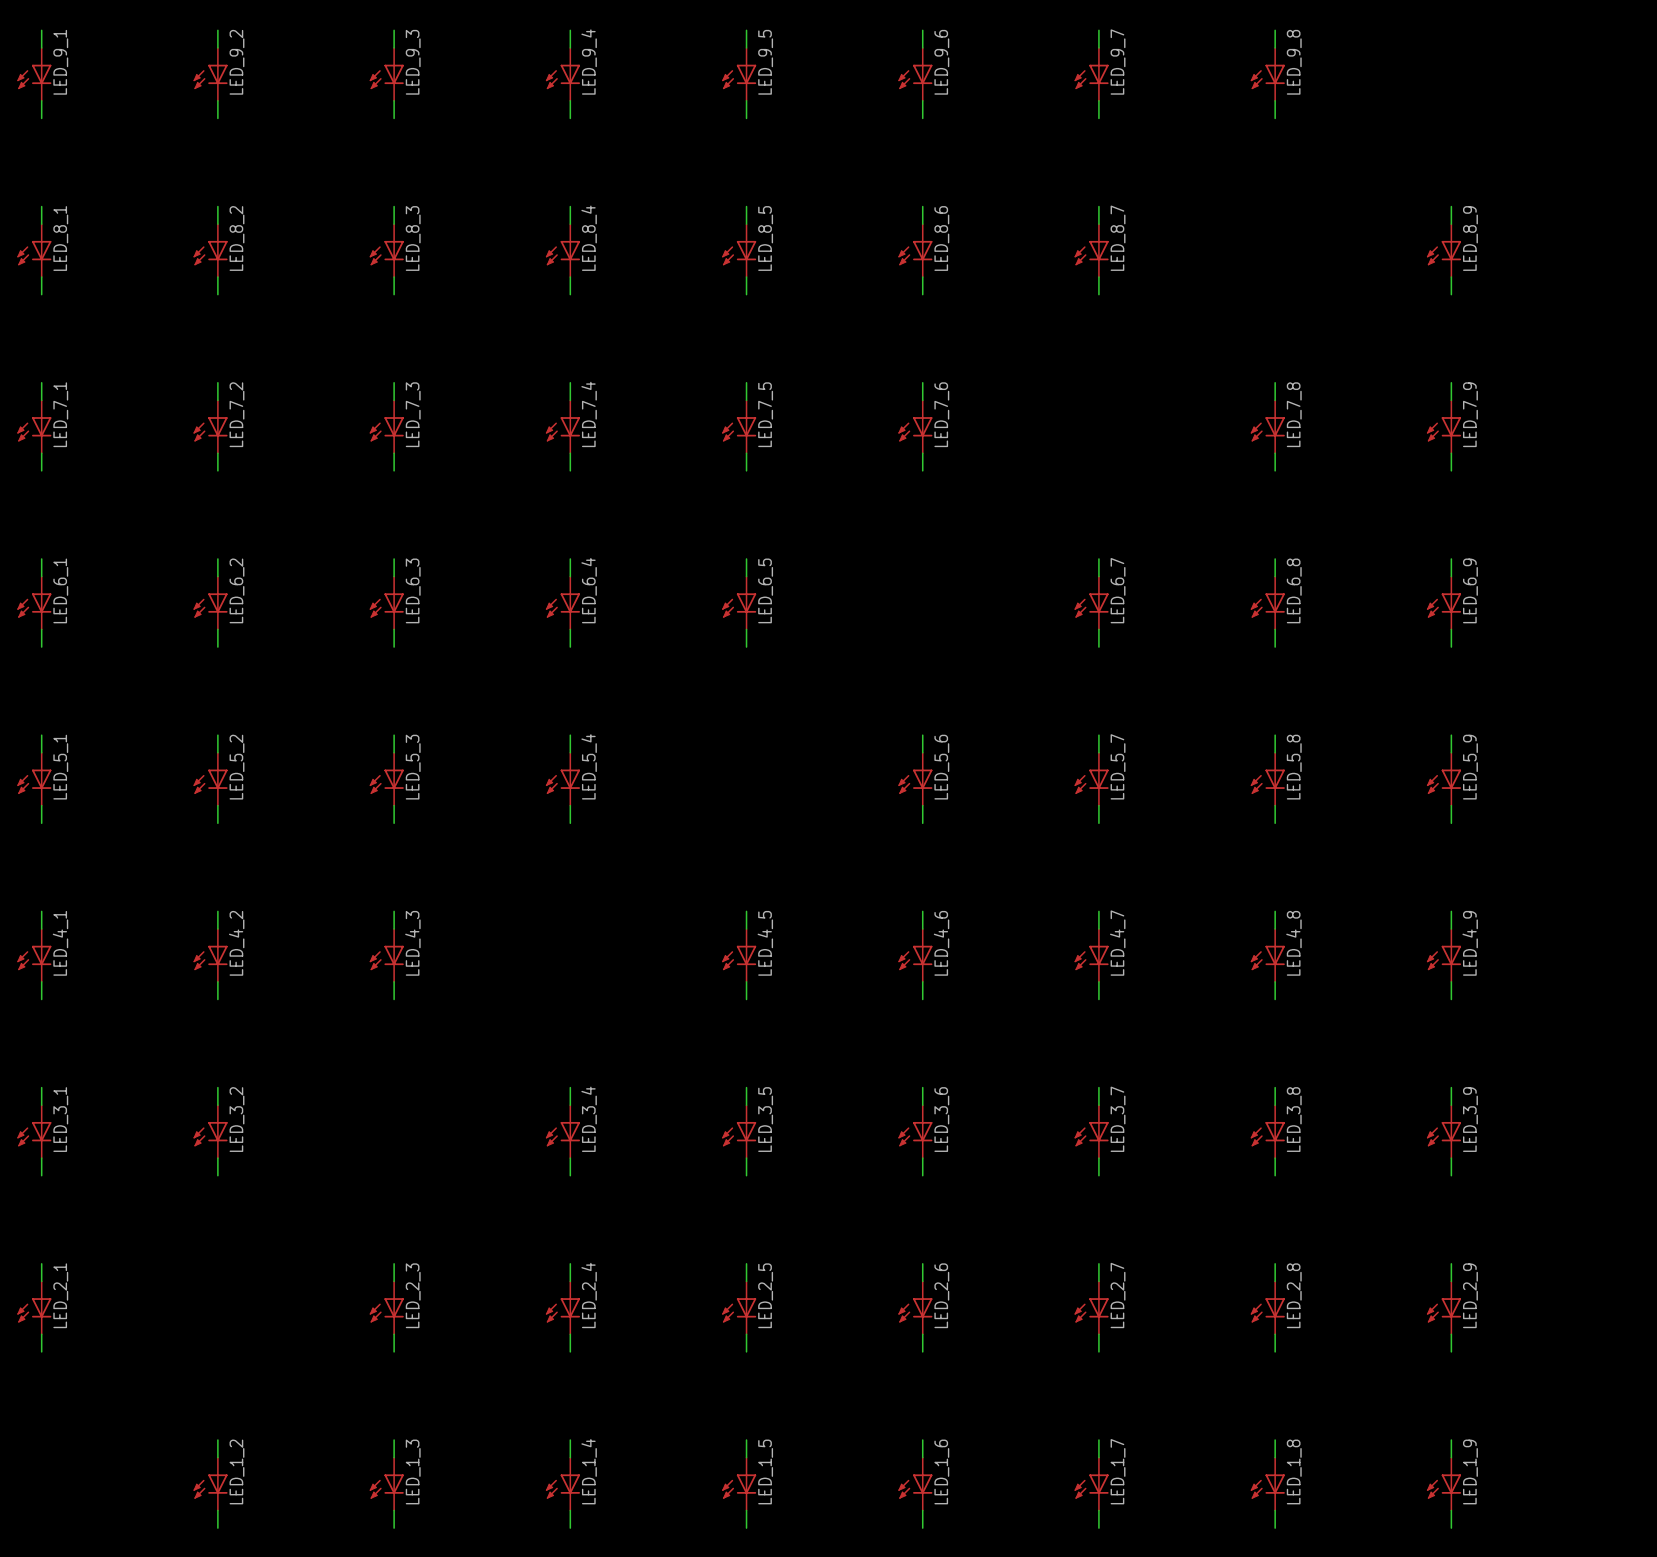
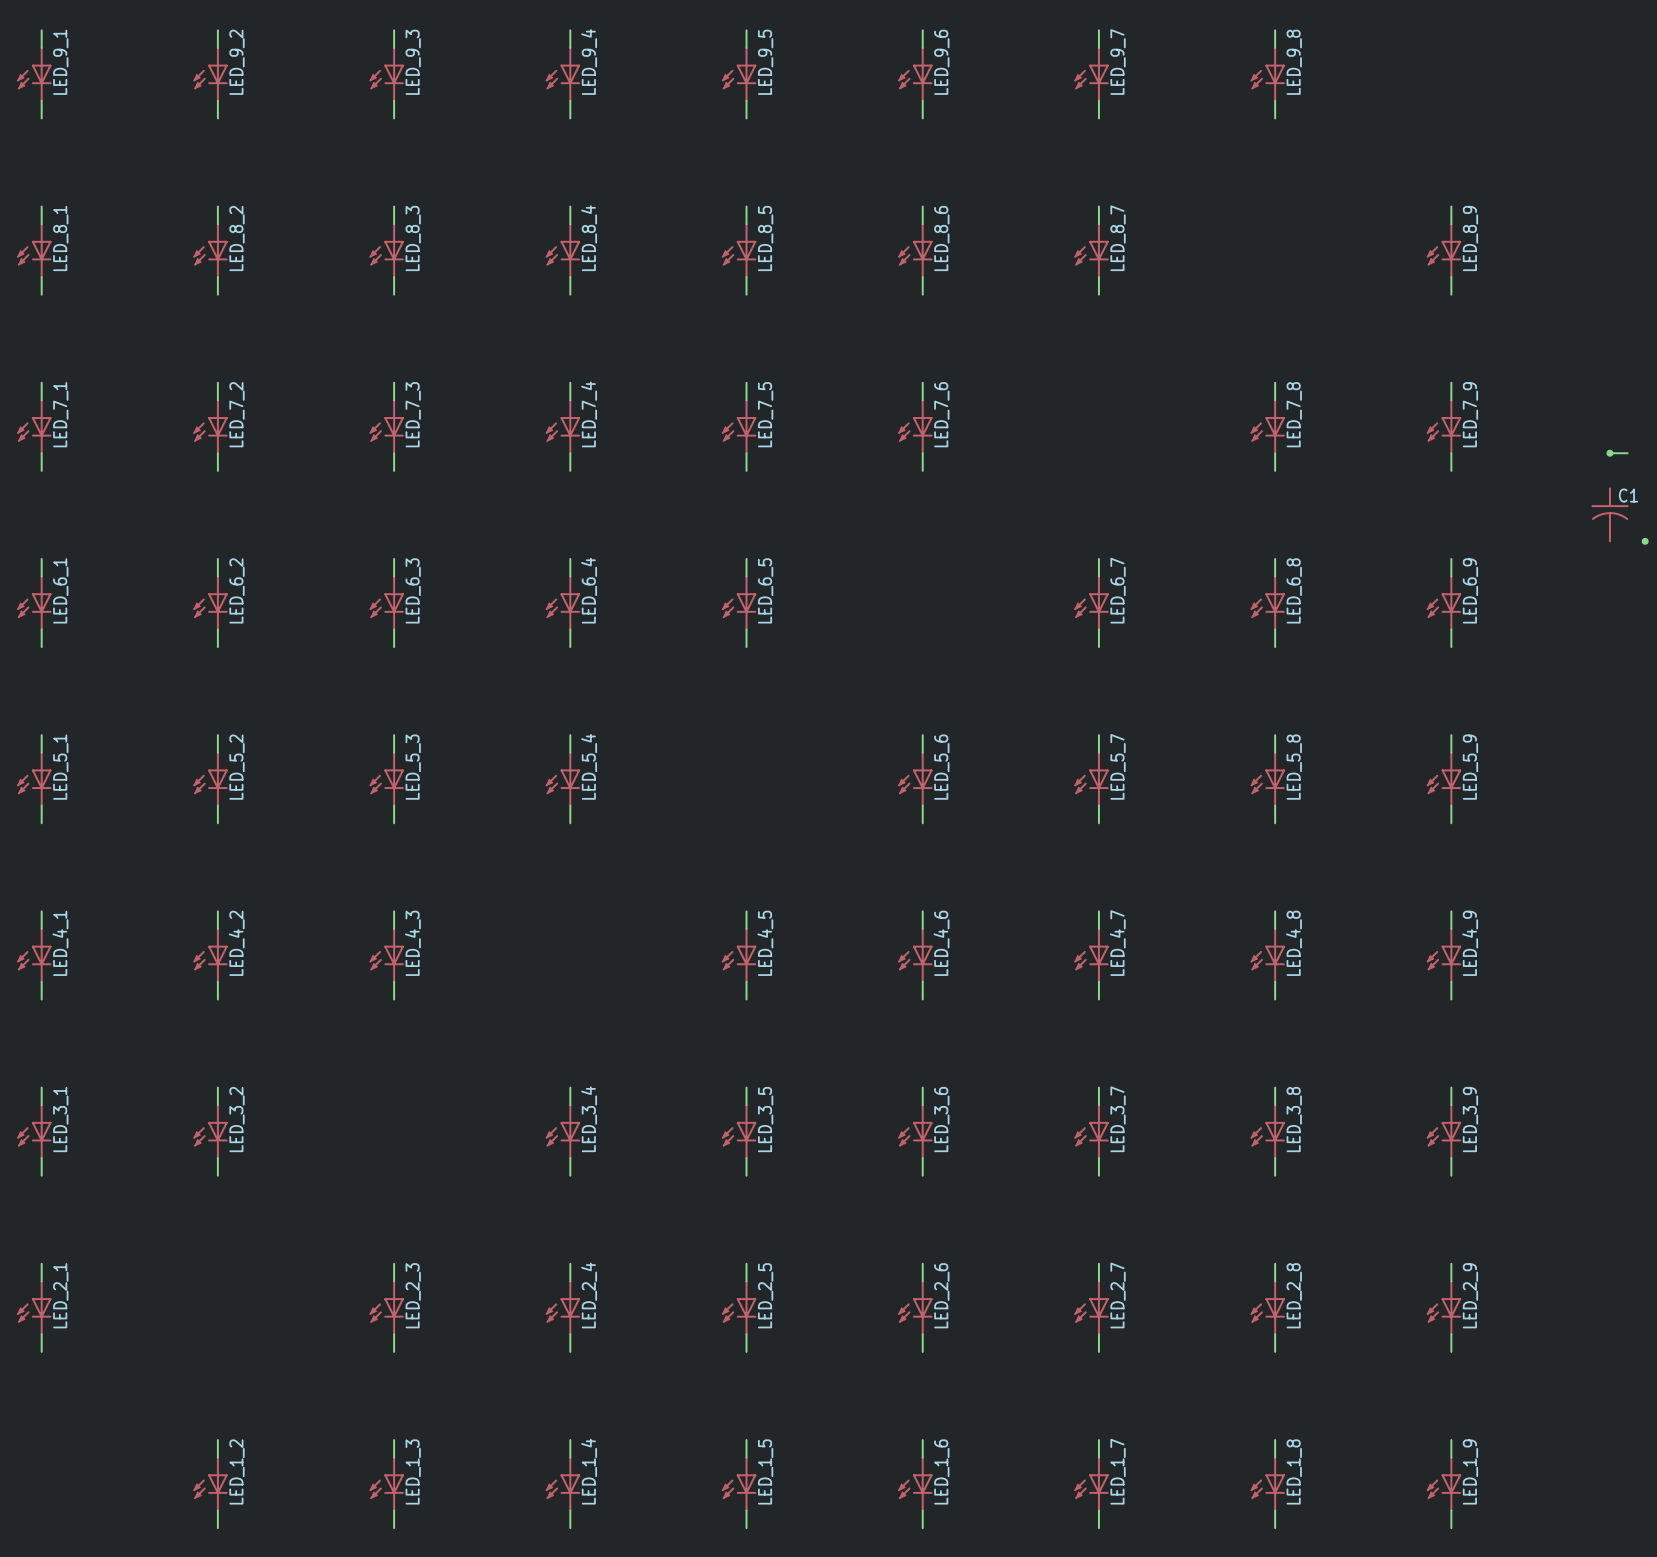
wire: none -> (1609, 453) (1627, 453)
junction: none -> (1609, 453)
C1: none -> (1609, 514)
junction: none -> (1645, 541)

